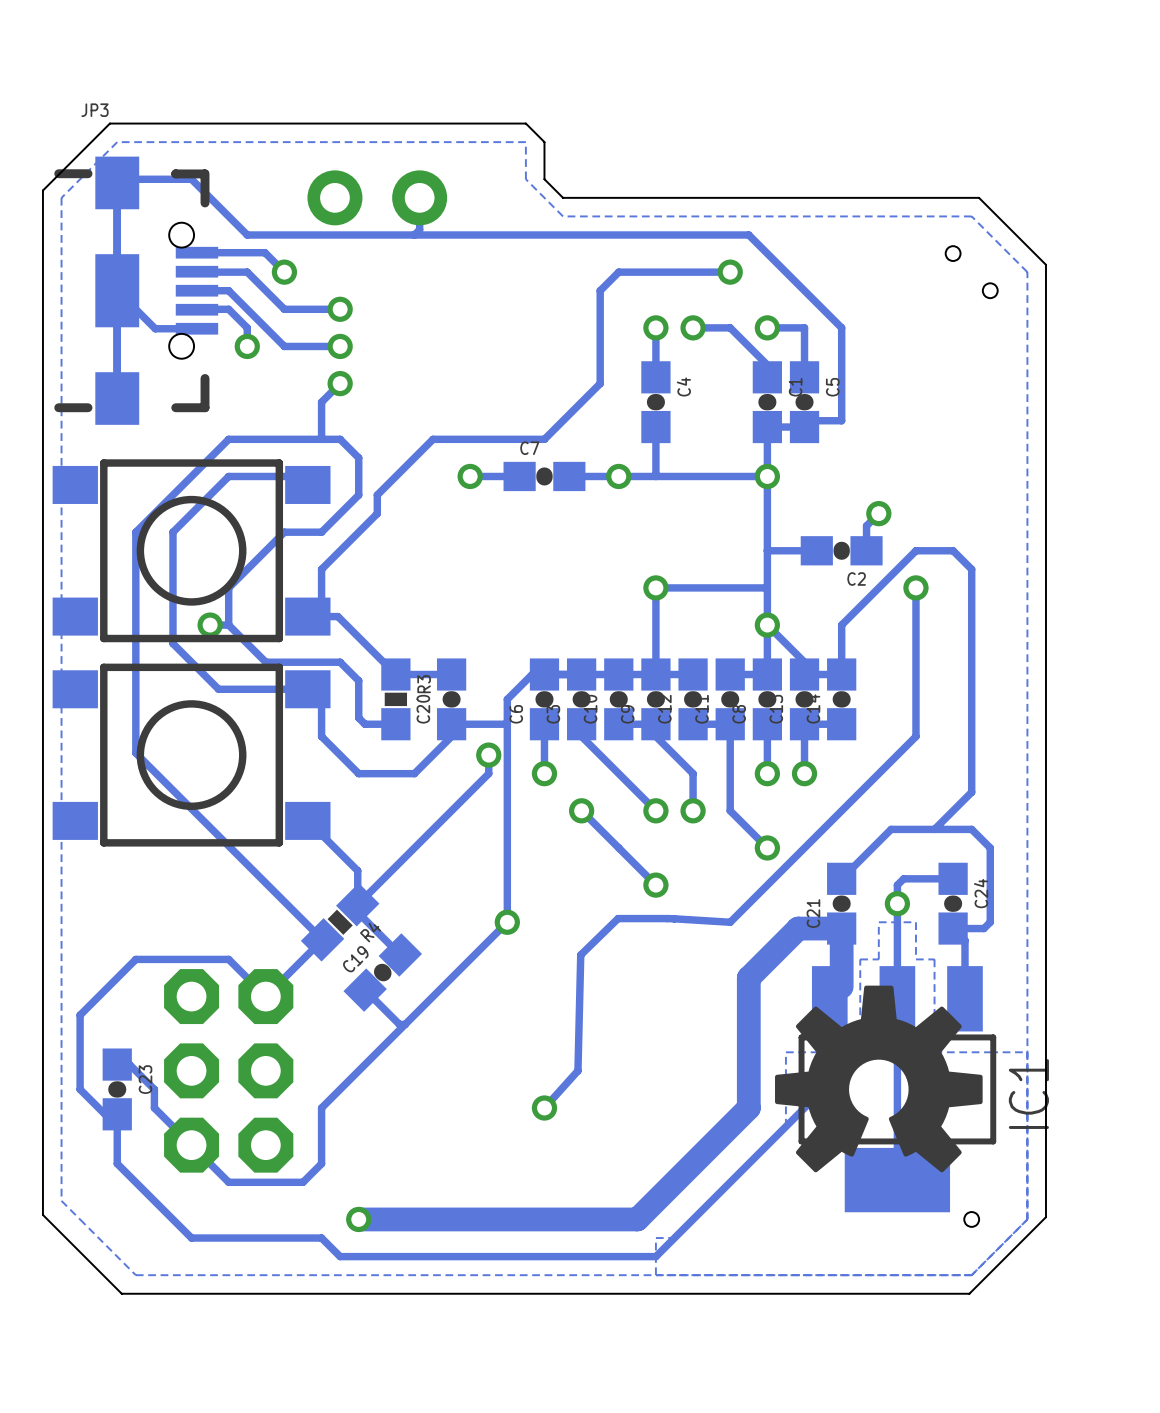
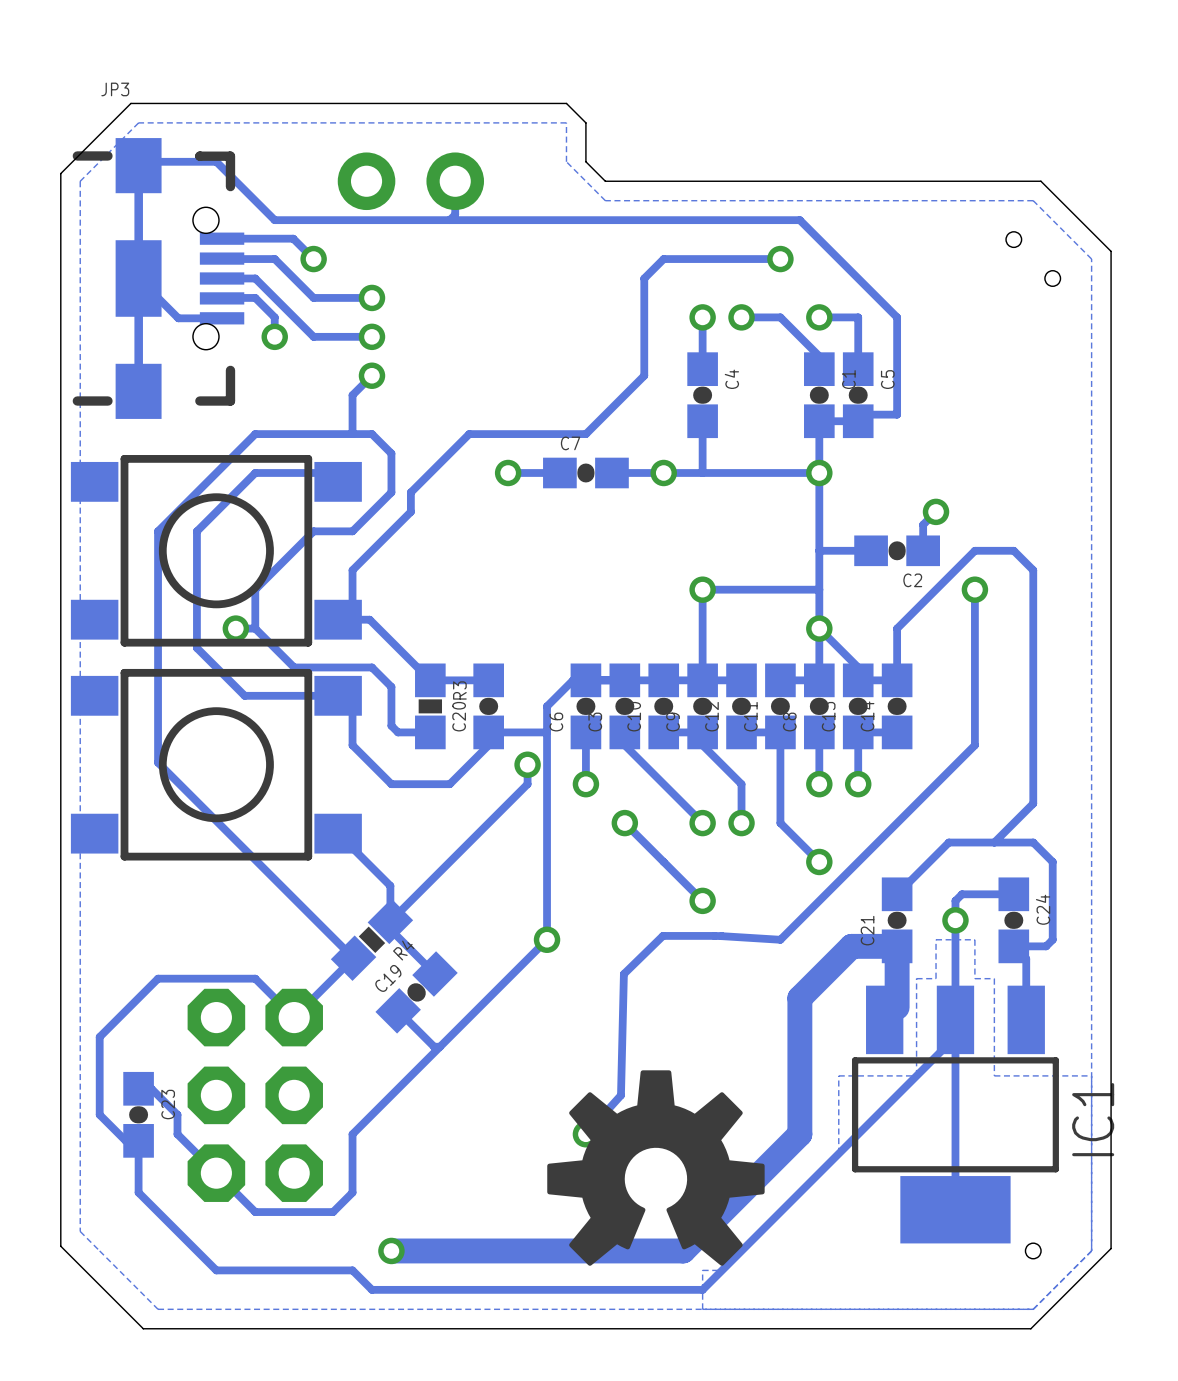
drawing position: (878, 1078) -> (655, 1168)

